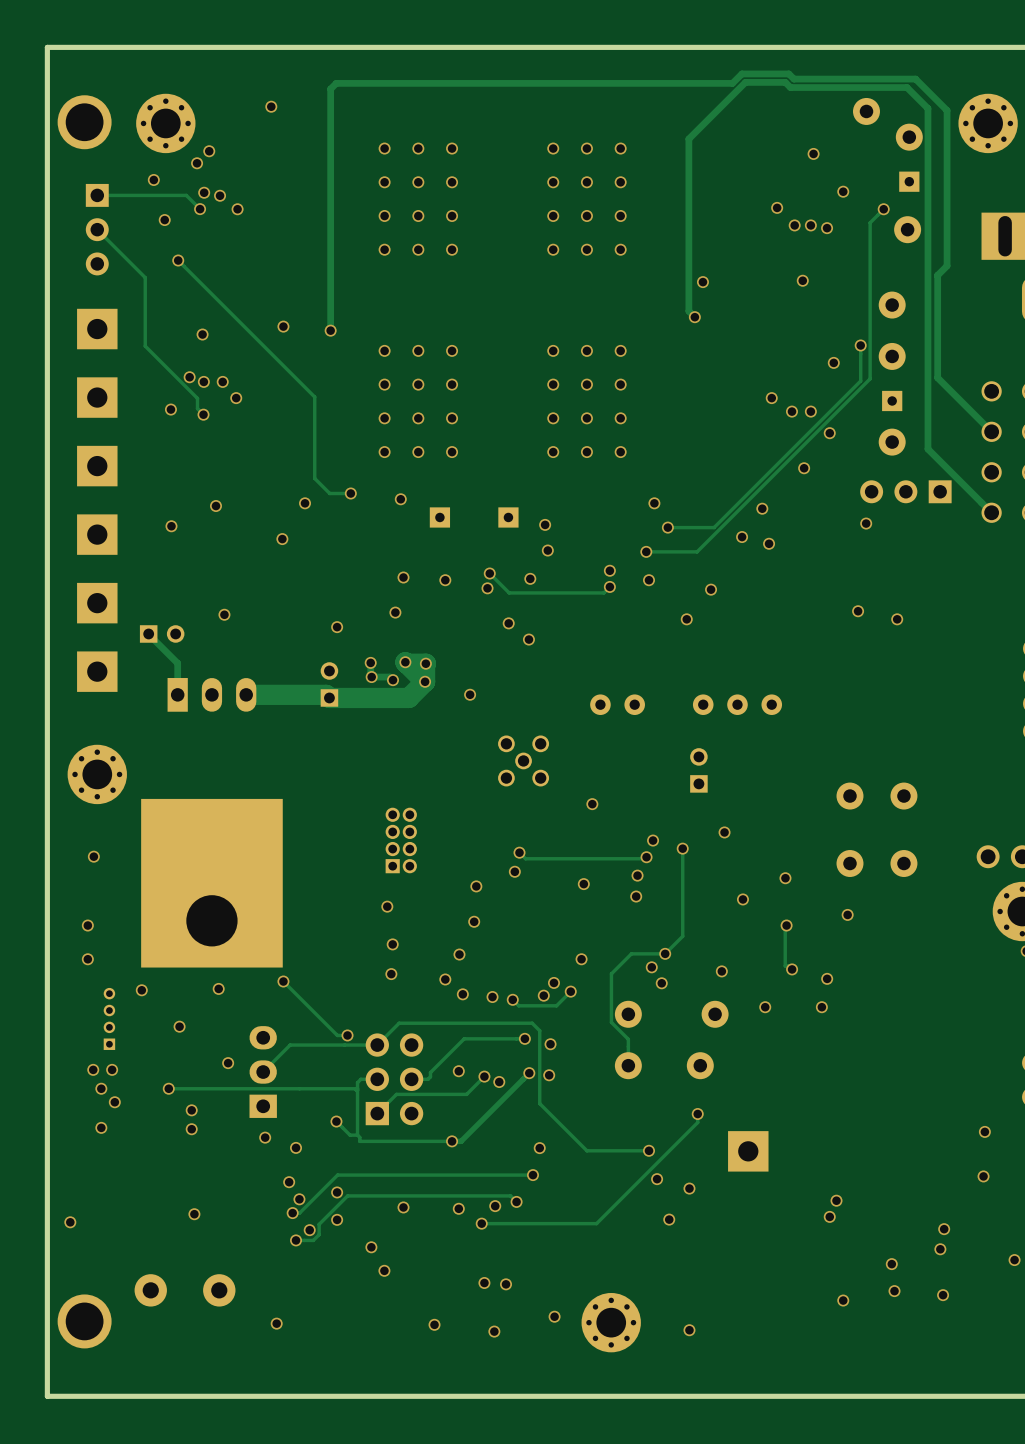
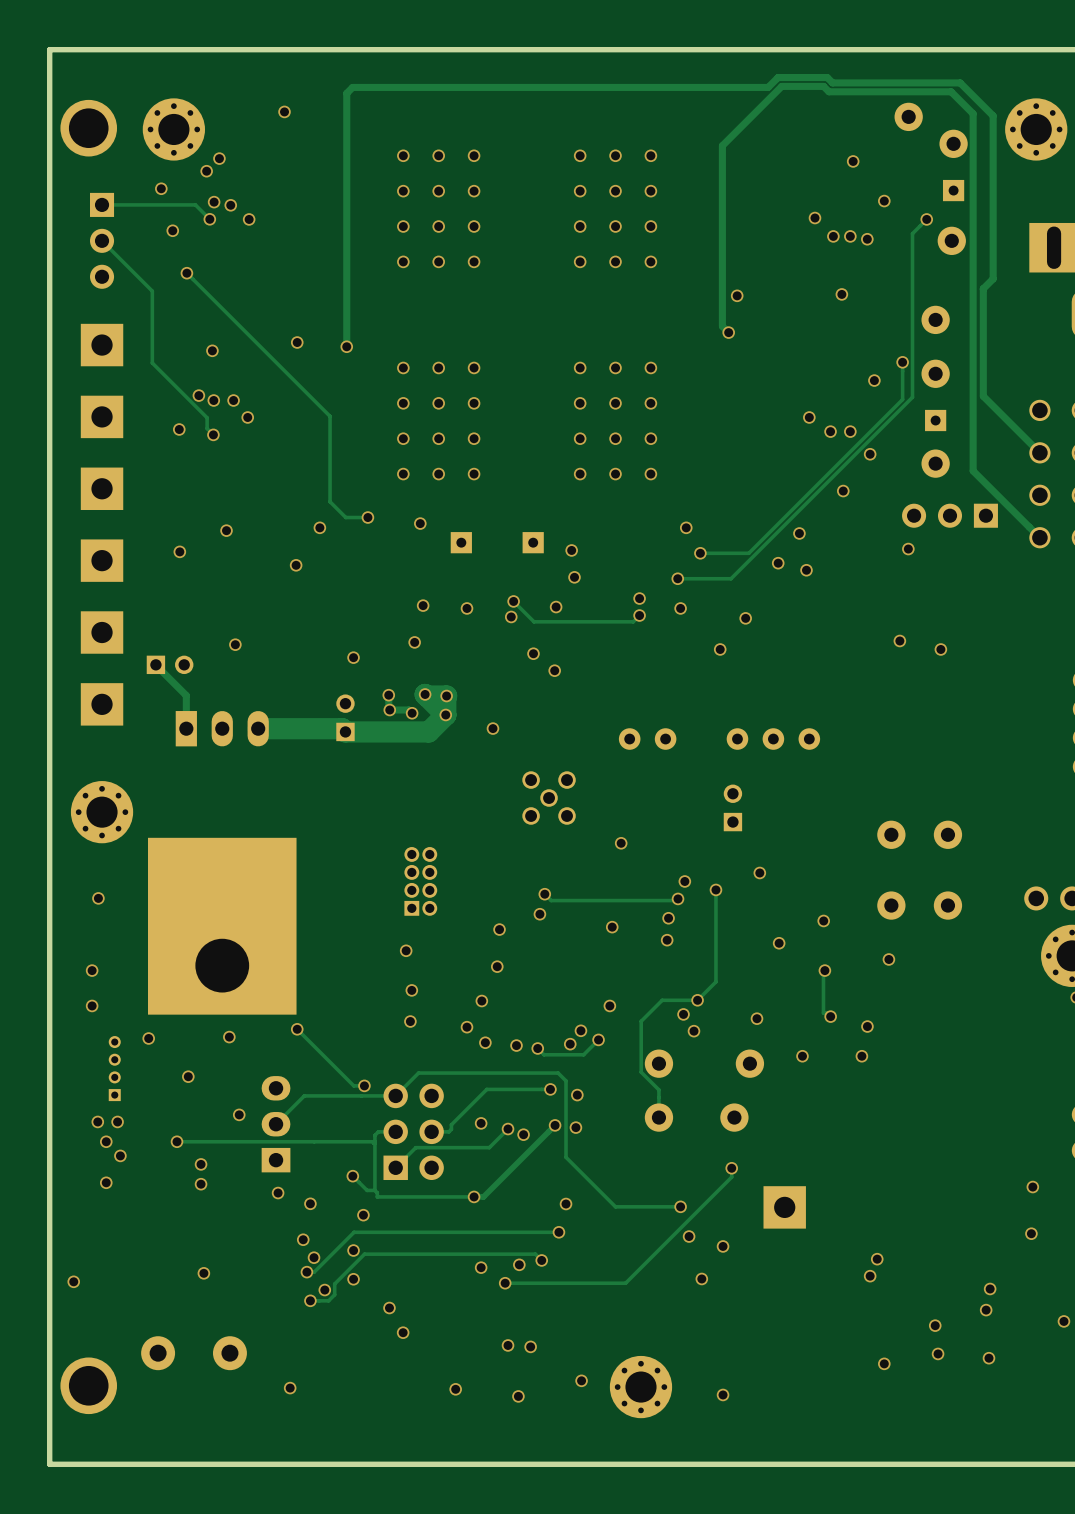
via position: (403, 1207) -> (363, 1215)

